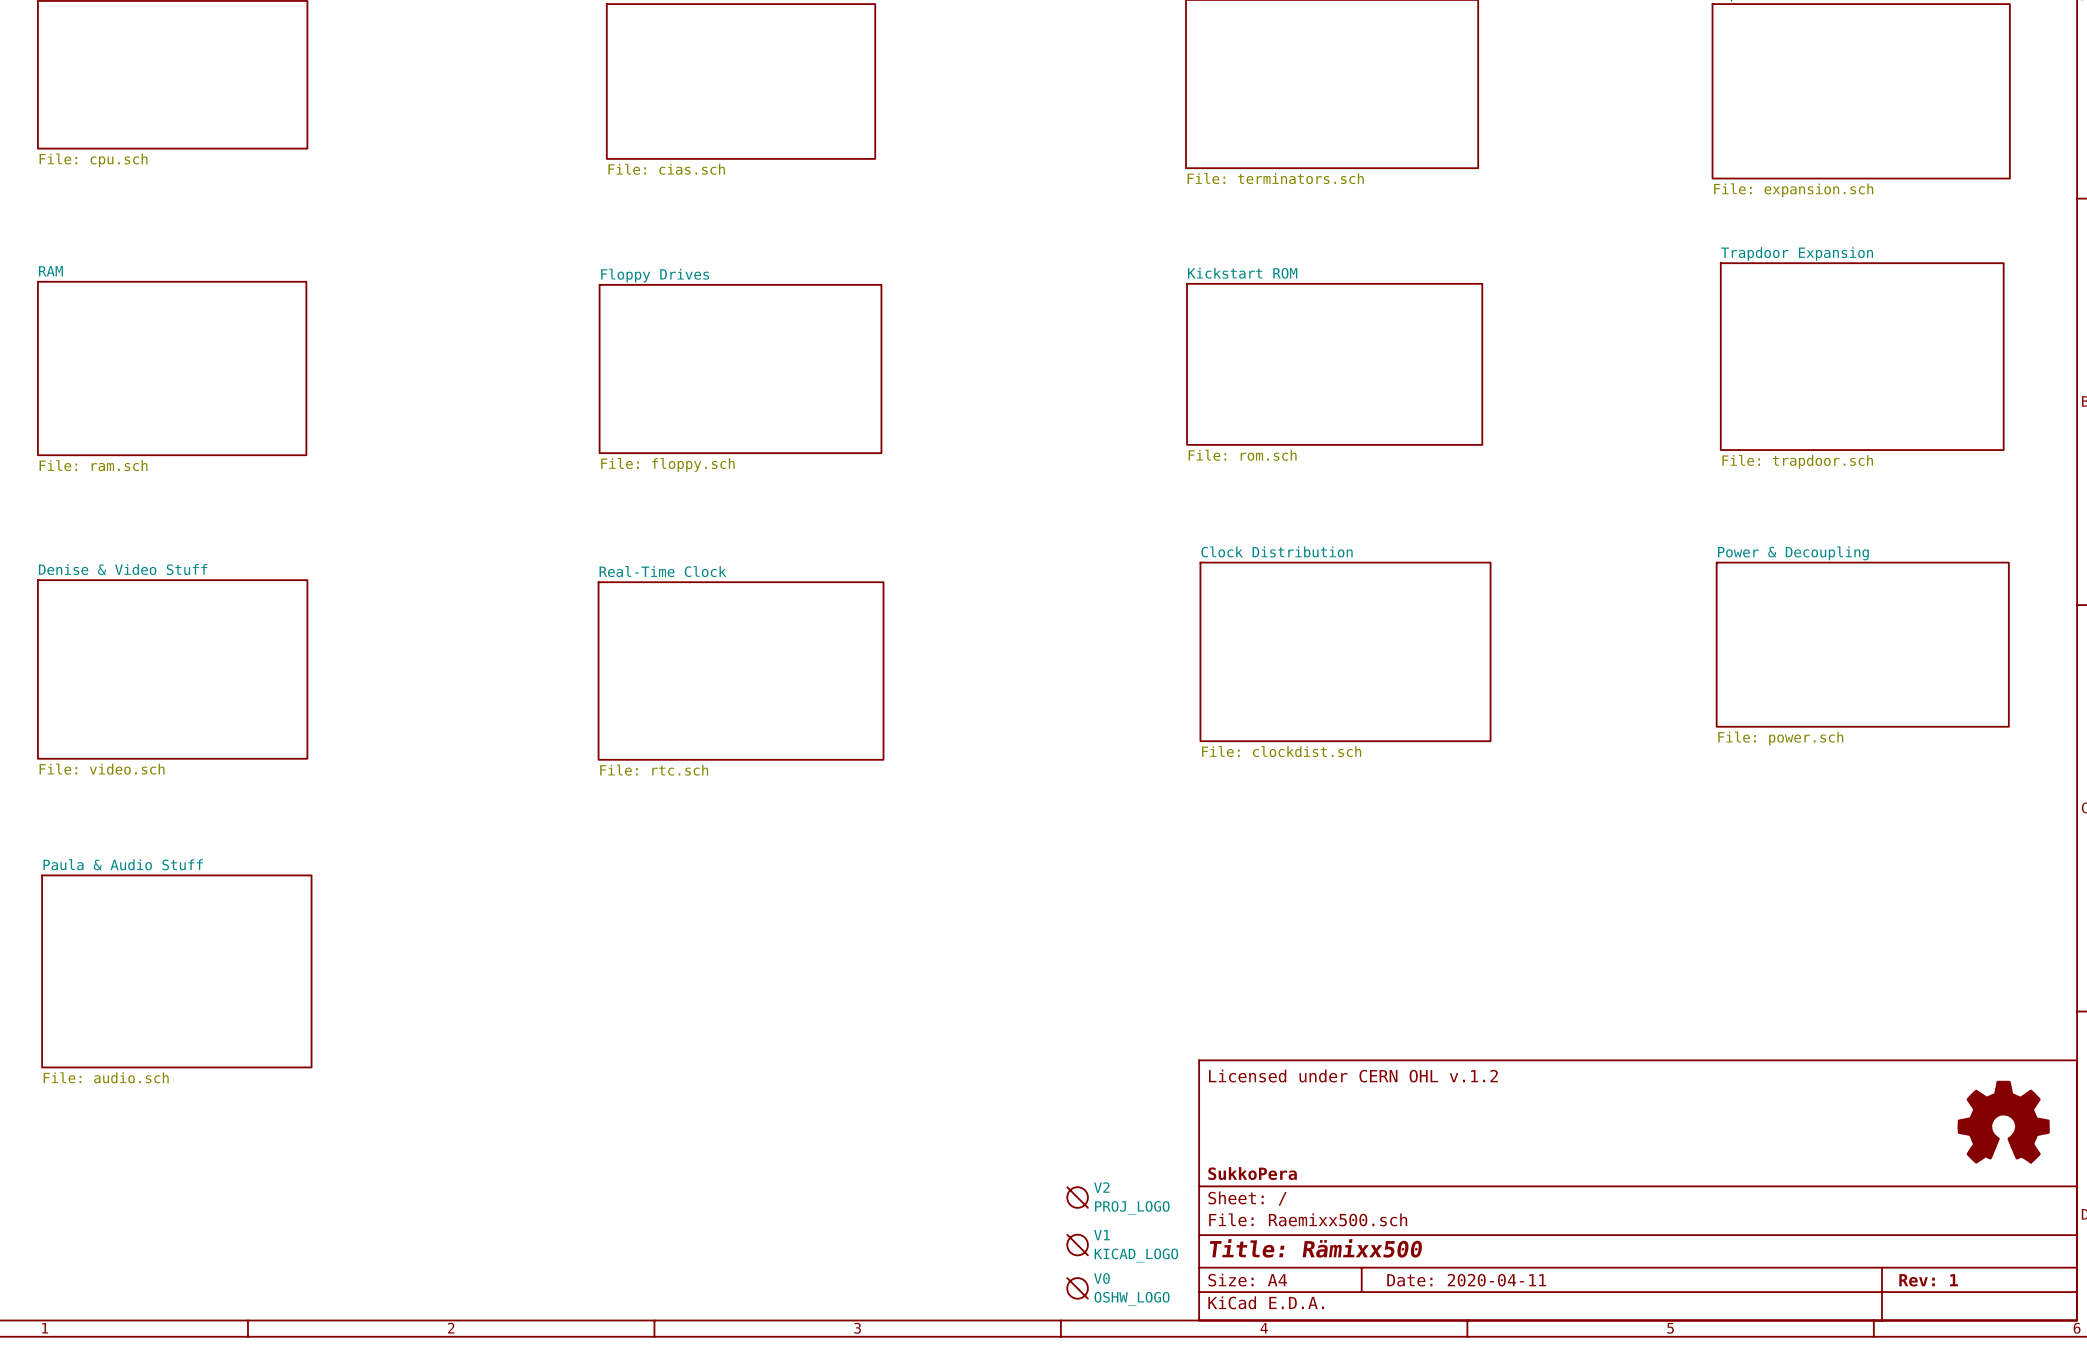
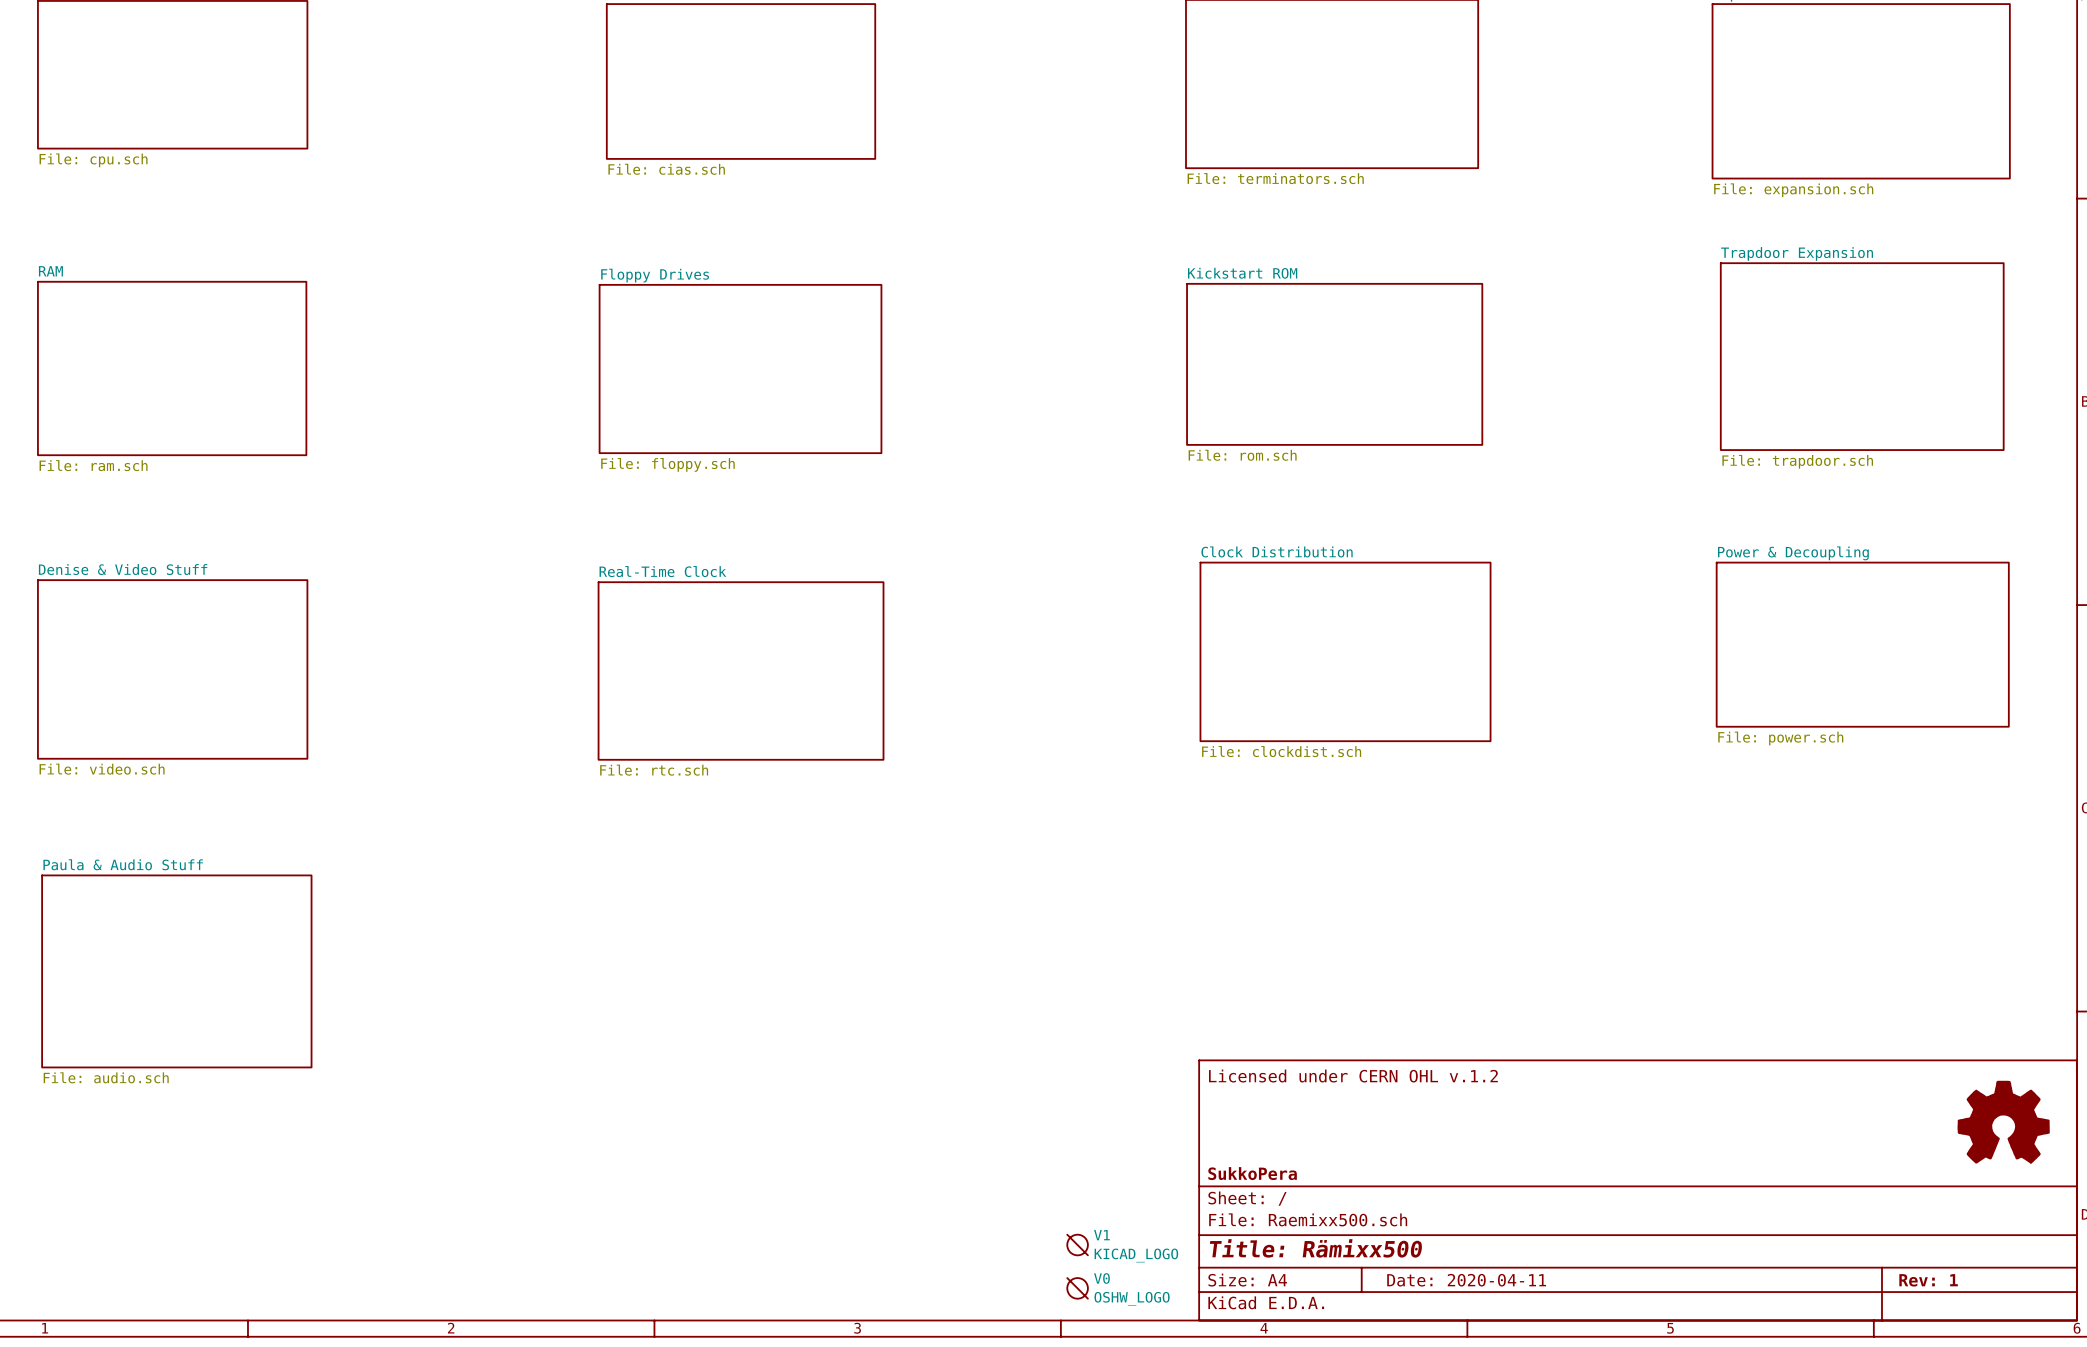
V2: PROJ_LOGO (1077, 1197) -> none

